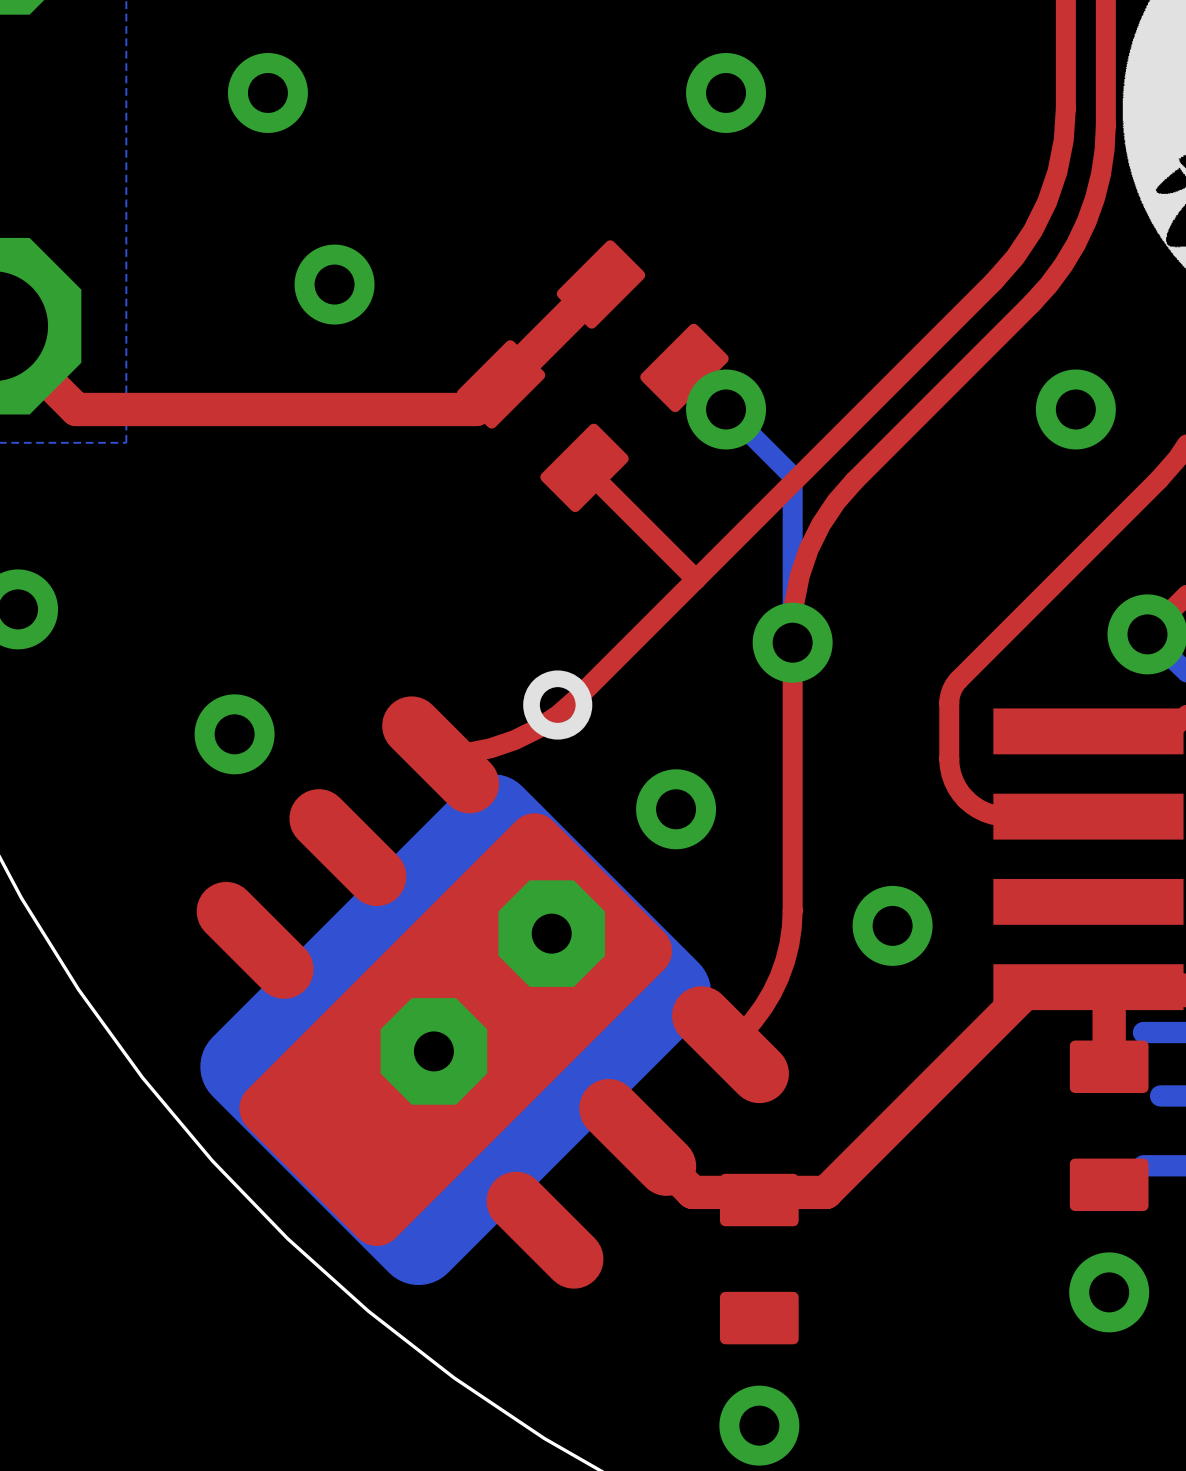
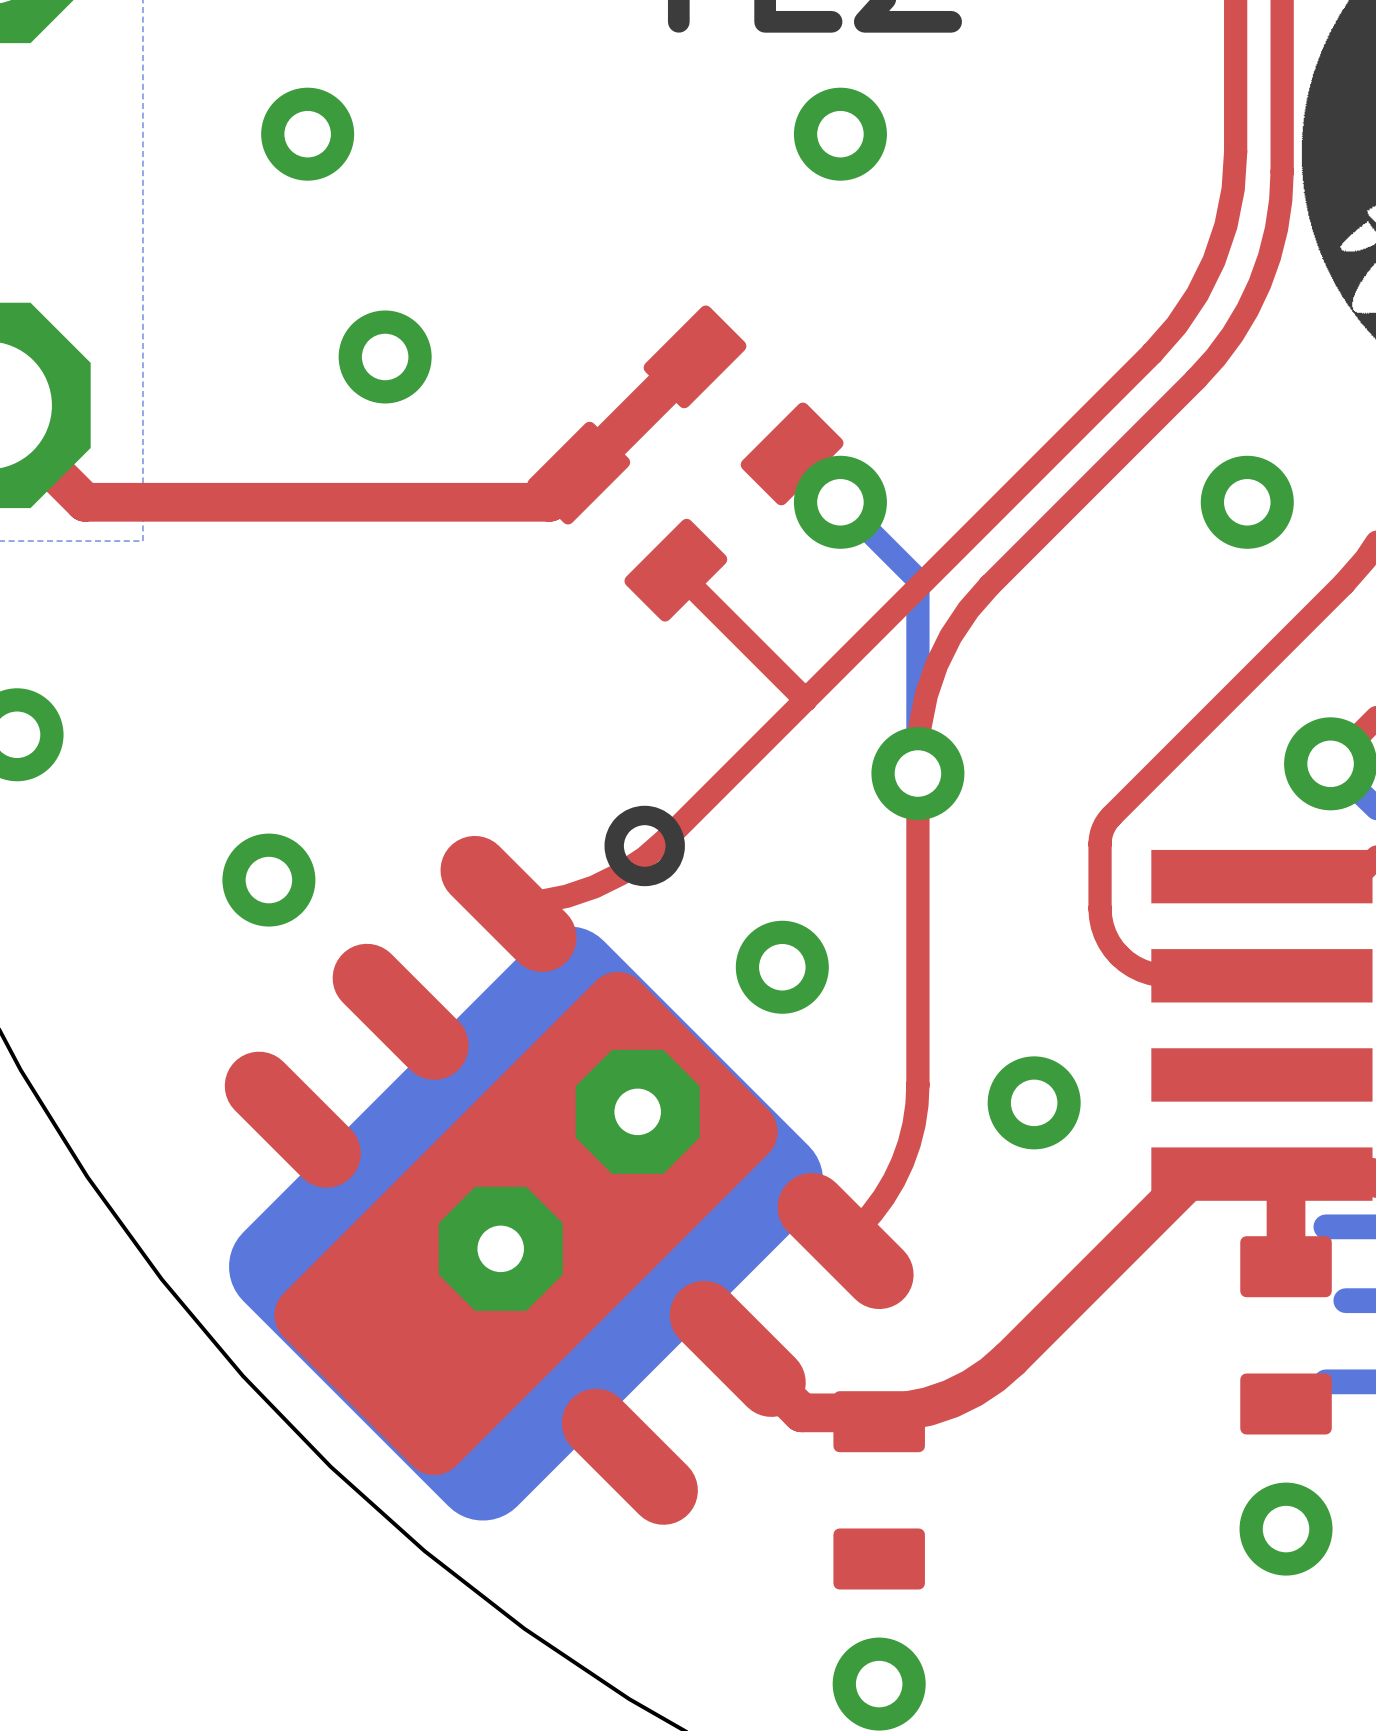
top track: (872, 1146) (825, 1192) (760, 1192) -> (1010, 1359) (992, 1374) (972, 1388) (950, 1398) (928, 1406) (904, 1411) (880, 1412)

